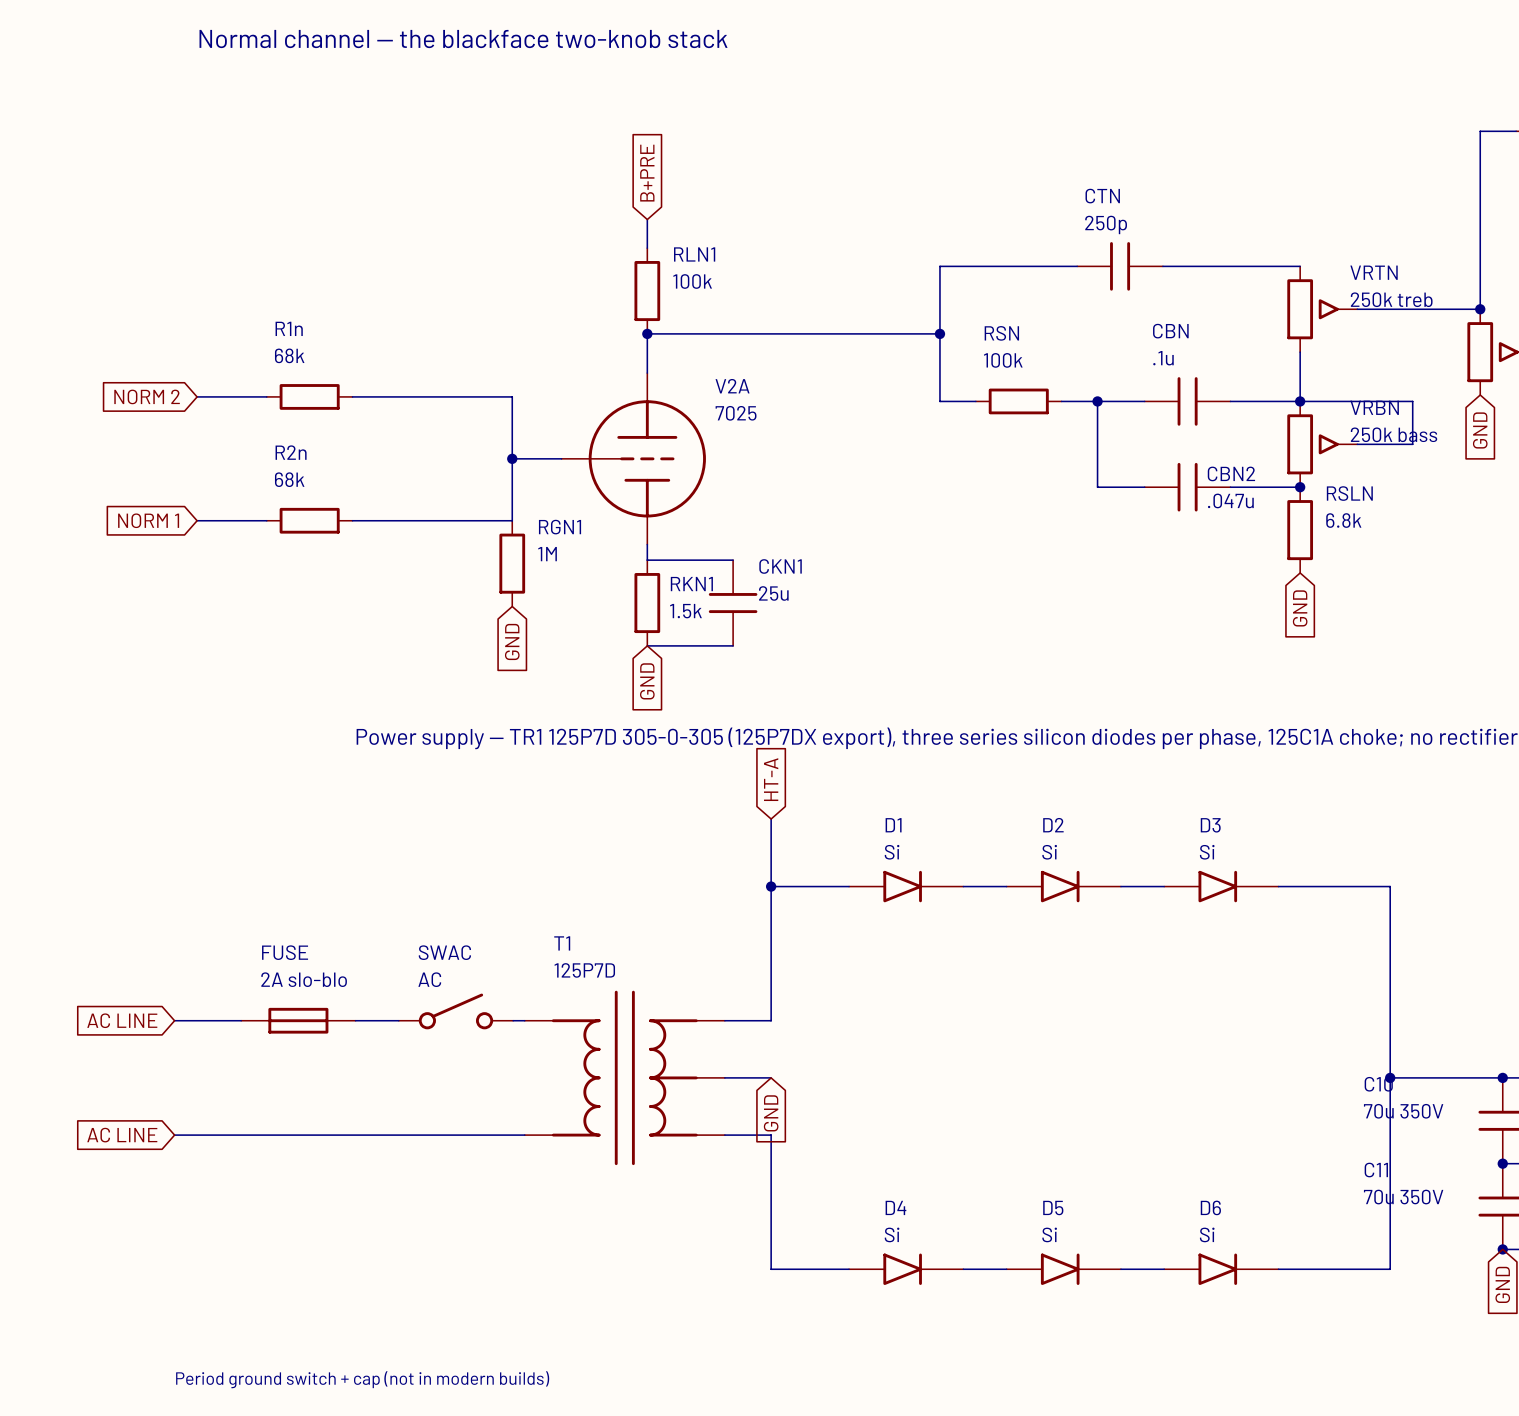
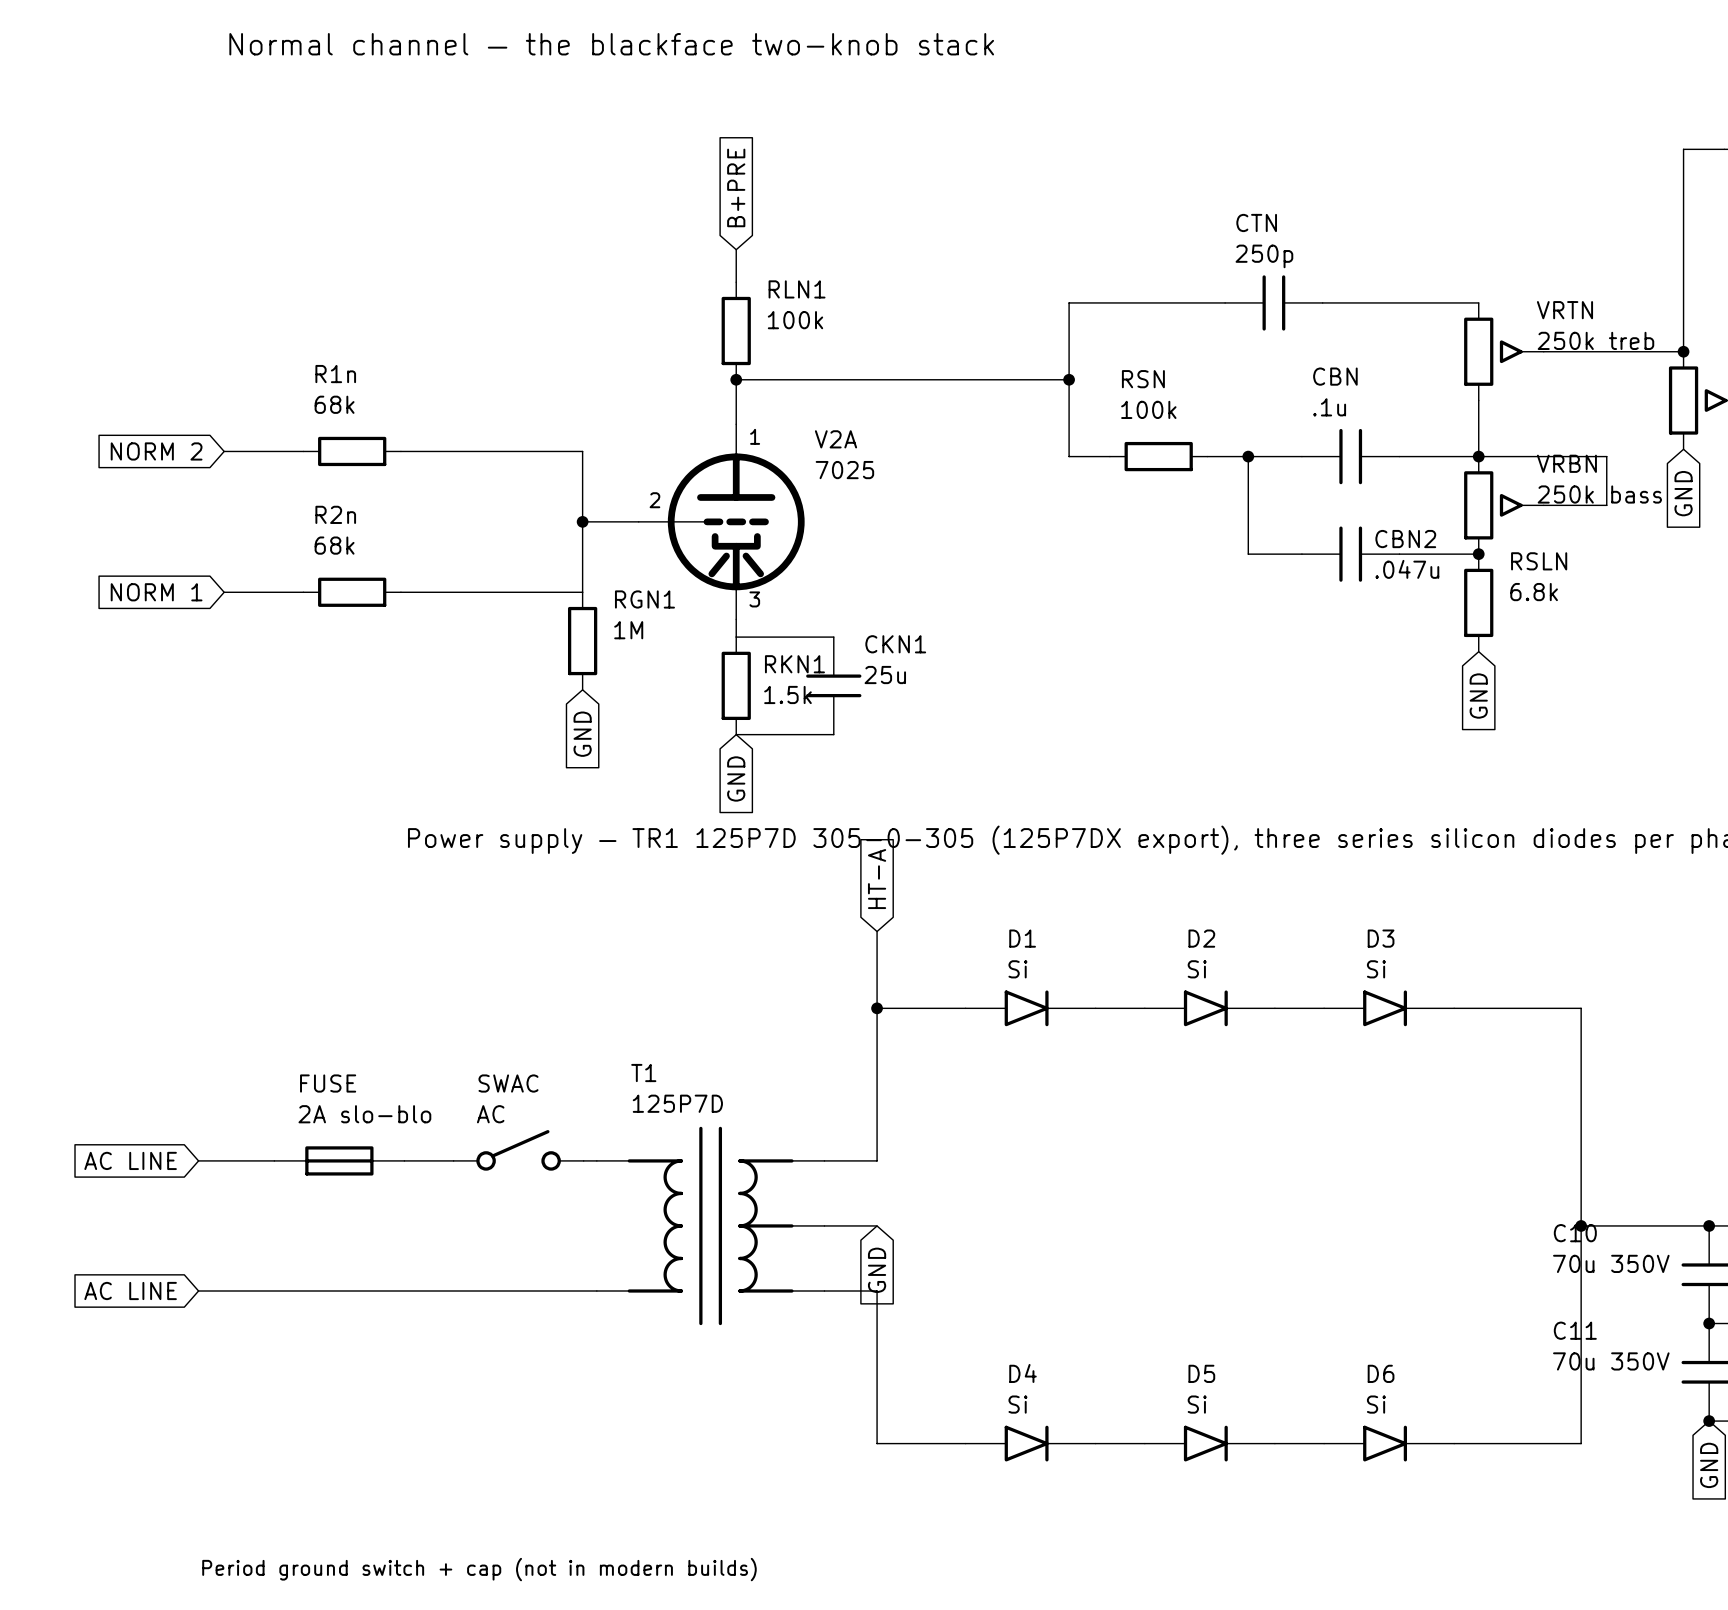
V2A symbol: [561, 373, 706, 545] -> [638, 424, 805, 620]
text: none -> 1 (755, 436)
text: none -> 2 (654, 500)
text: none -> 3 (754, 599)

